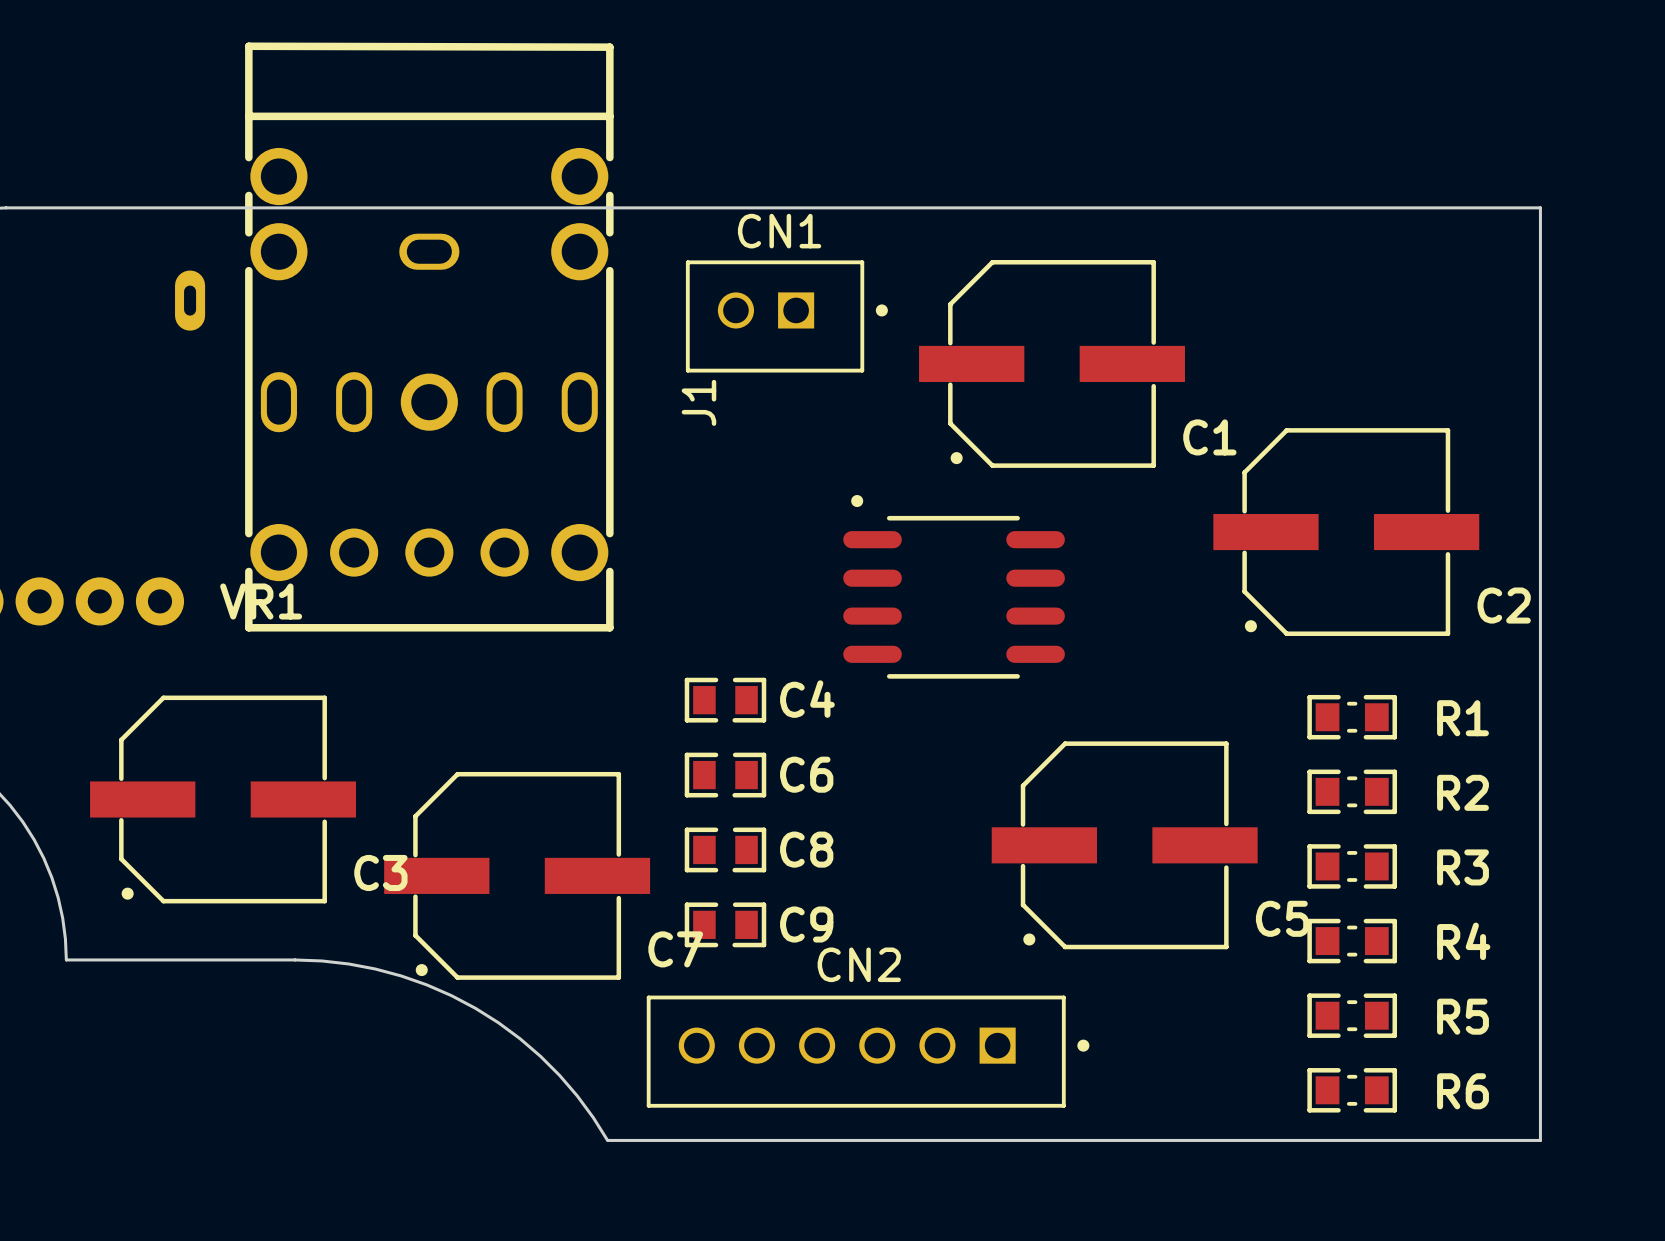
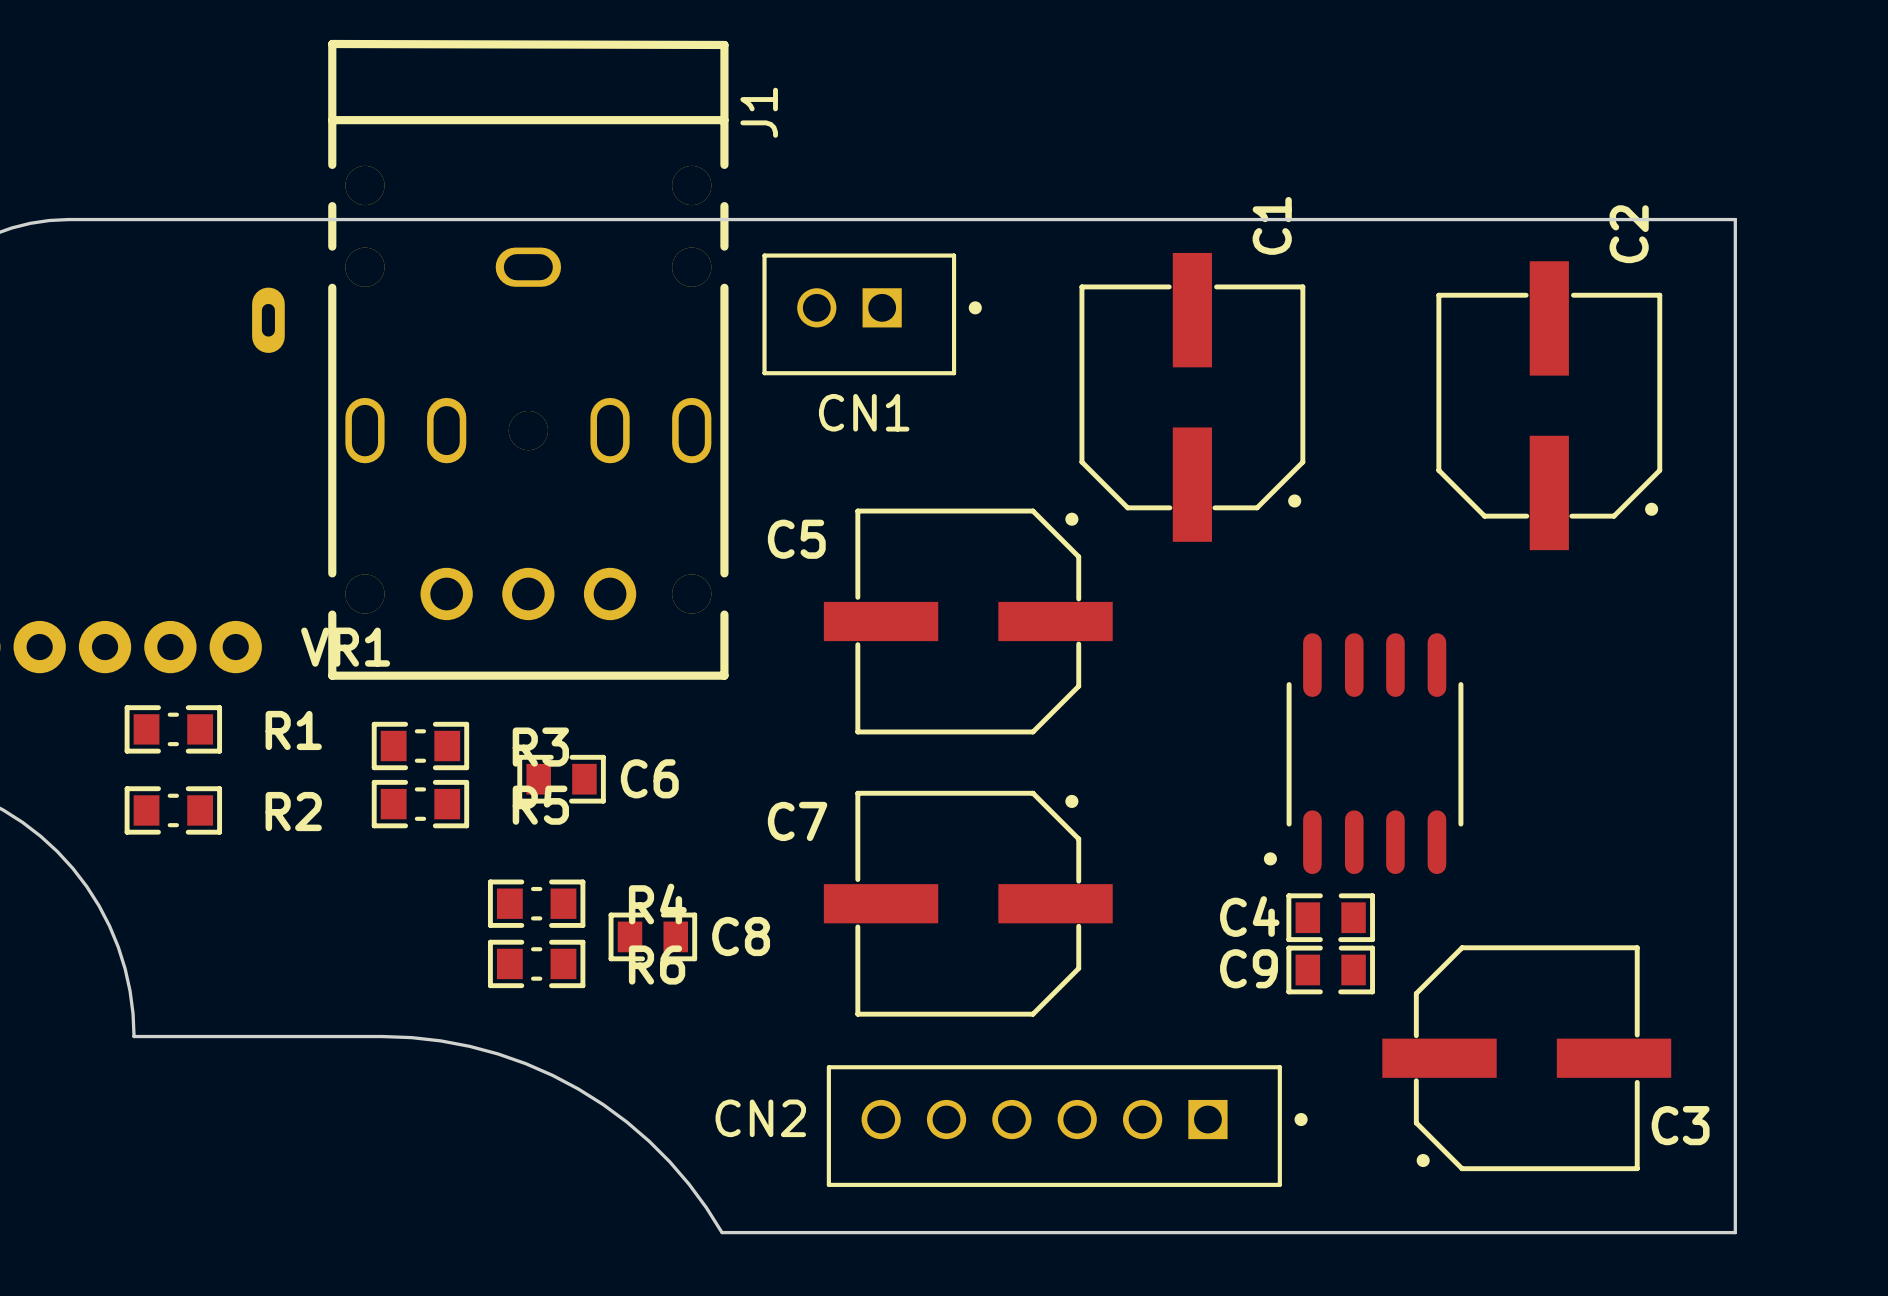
J1 footprint: [245, 42, 614, 632] -> [328, 39, 729, 680]
CN1 name position: CN1 (779, 231) -> CN1 (864, 412)
CN1 position: (786, 316) -> (872, 314)
C1 rotation: 0° (1052, 363) -> 90° counterclockwise (1192, 397)
J1 name position: J1 (698, 402) -> J1 (759, 112)
C2 rotation: 0° (1346, 532) -> 90° counterclockwise (1549, 405)
part rotation: 0° (954, 586) -> 90° counterclockwise (1363, 753)
part position: (954, 586) -> (1363, 753)
C4 name position: C4 (807, 699) -> C4 (1249, 916)
C4 position: (725, 700) -> (1330, 917)
R1 position: (1352, 717) -> (173, 729)
C6 position: (725, 775) -> (561, 779)
R2 position: (1352, 791) -> (173, 810)
C3 position: (223, 799) -> (1526, 1058)
C5 rotation: 0° (1124, 845) -> 180° (968, 621)
C5 position: (1124, 845) -> (968, 621)
C8 position: (725, 849) -> (652, 936)
R3 position: (1352, 866) -> (420, 746)
C3 name position: C3 (380, 872) -> C3 (1680, 1125)
C7 rotation: 0° (517, 875) -> 180° (968, 903)
C7 position: (517, 875) -> (968, 903)
C9 position: (725, 924) -> (1330, 969)
C9 name position: C9 (806, 924) -> C9 (1249, 968)
R4 position: (1352, 941) -> (536, 903)
CN2 name position: CN2 (859, 964) -> CN2 (760, 1118)
R5 position: (1352, 1015) -> (420, 804)
CN2 position: (868, 1051) -> (1067, 1126)
R6 position: (1352, 1090) -> (536, 963)

